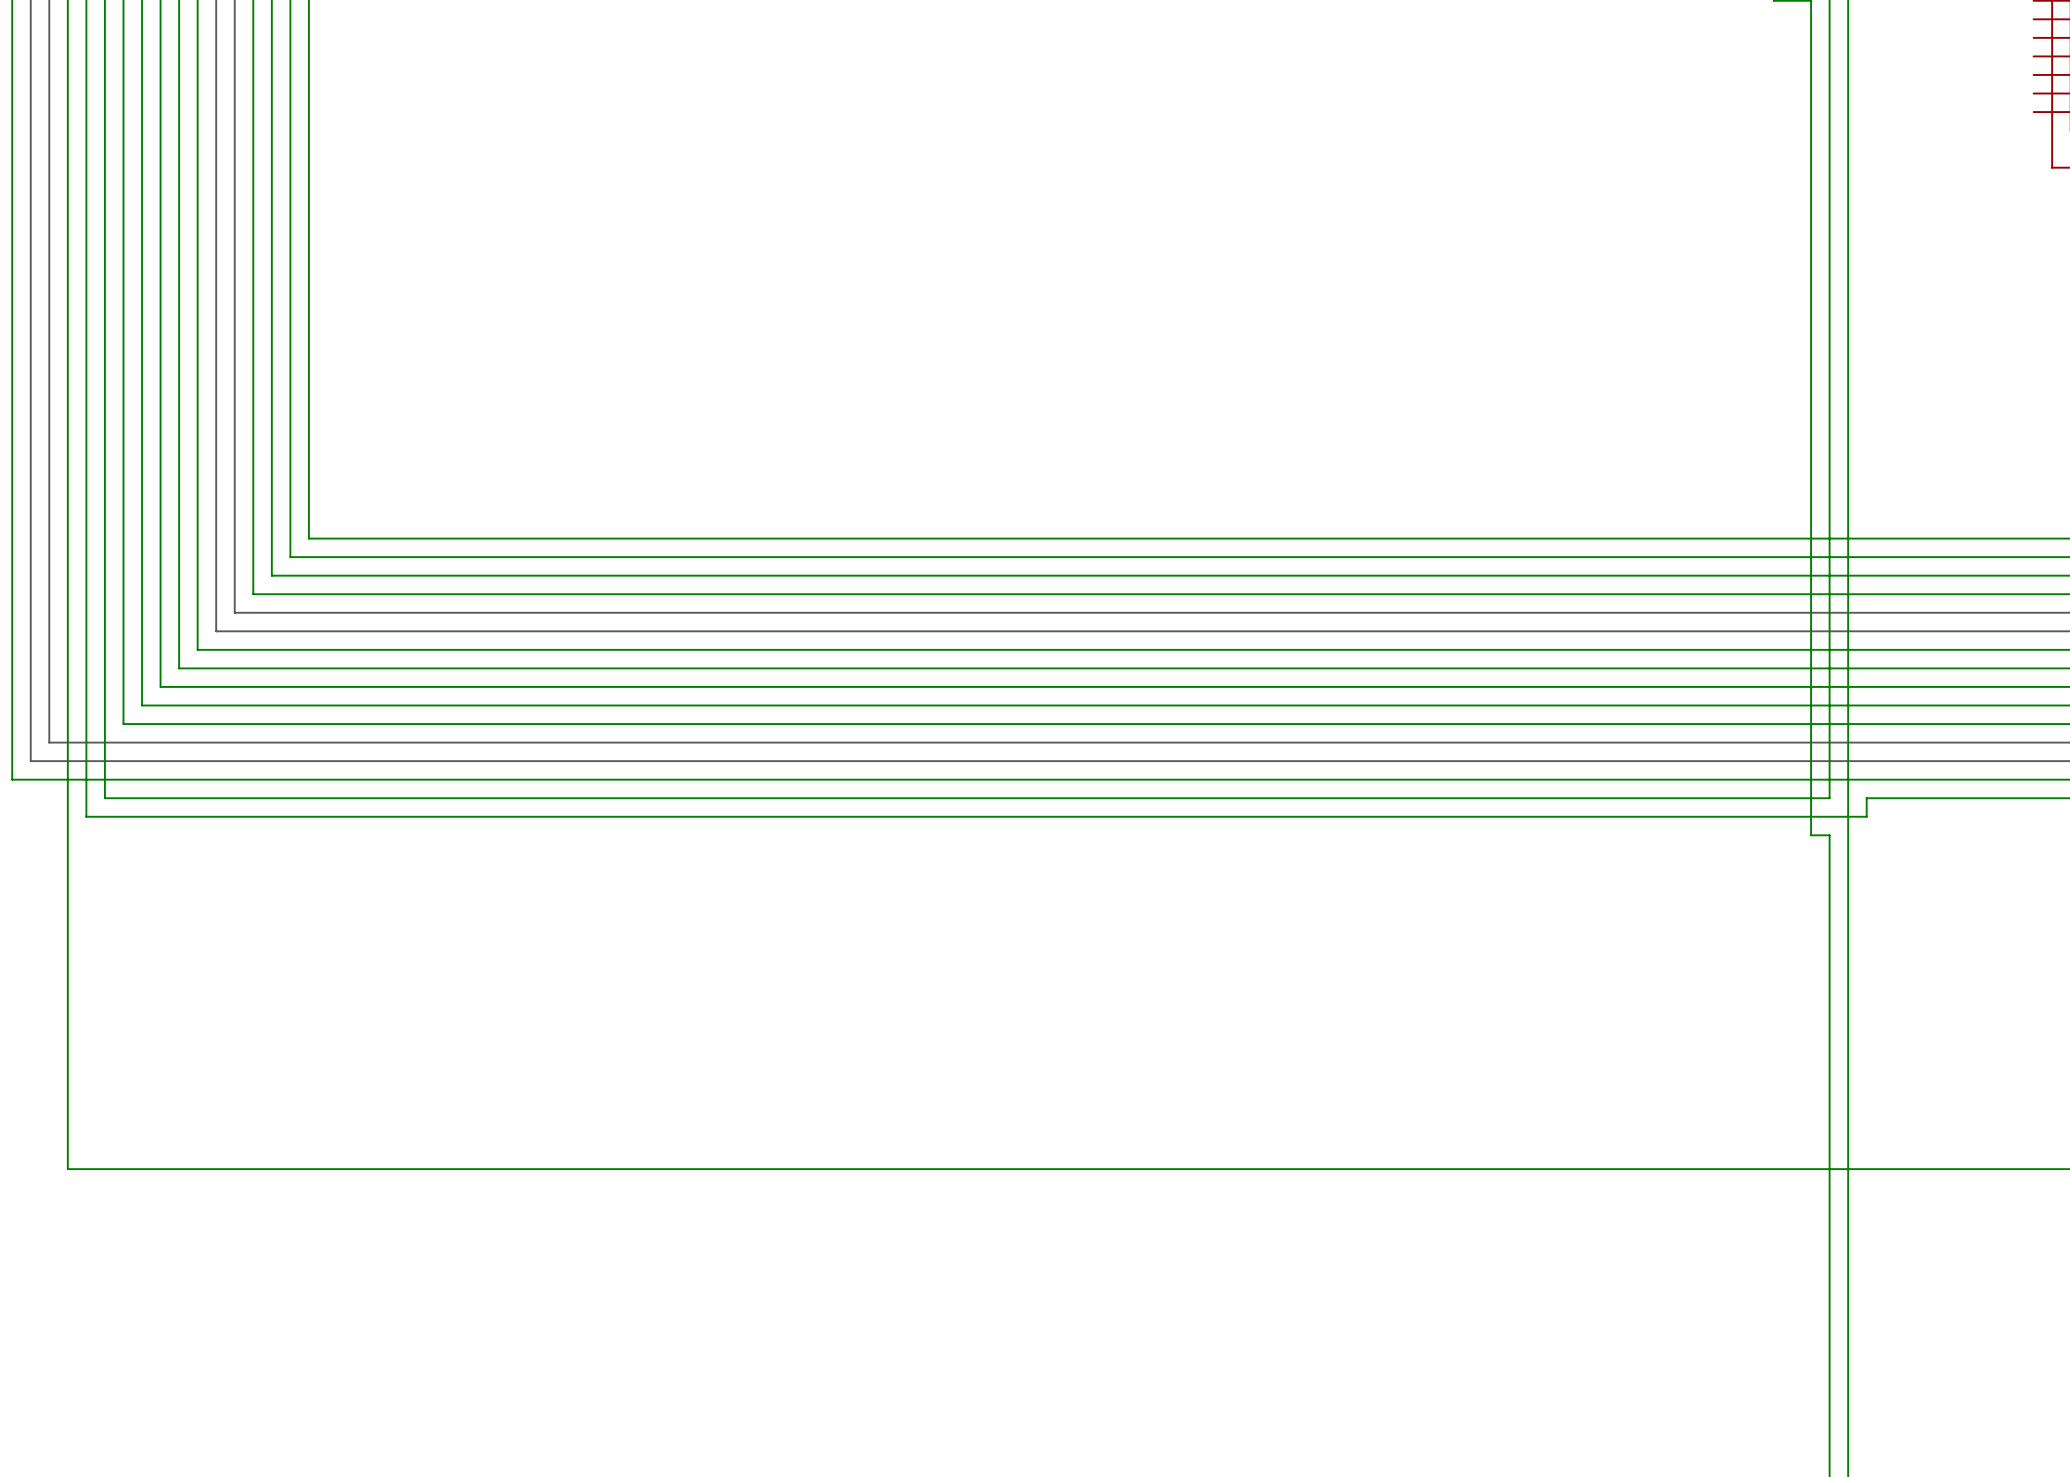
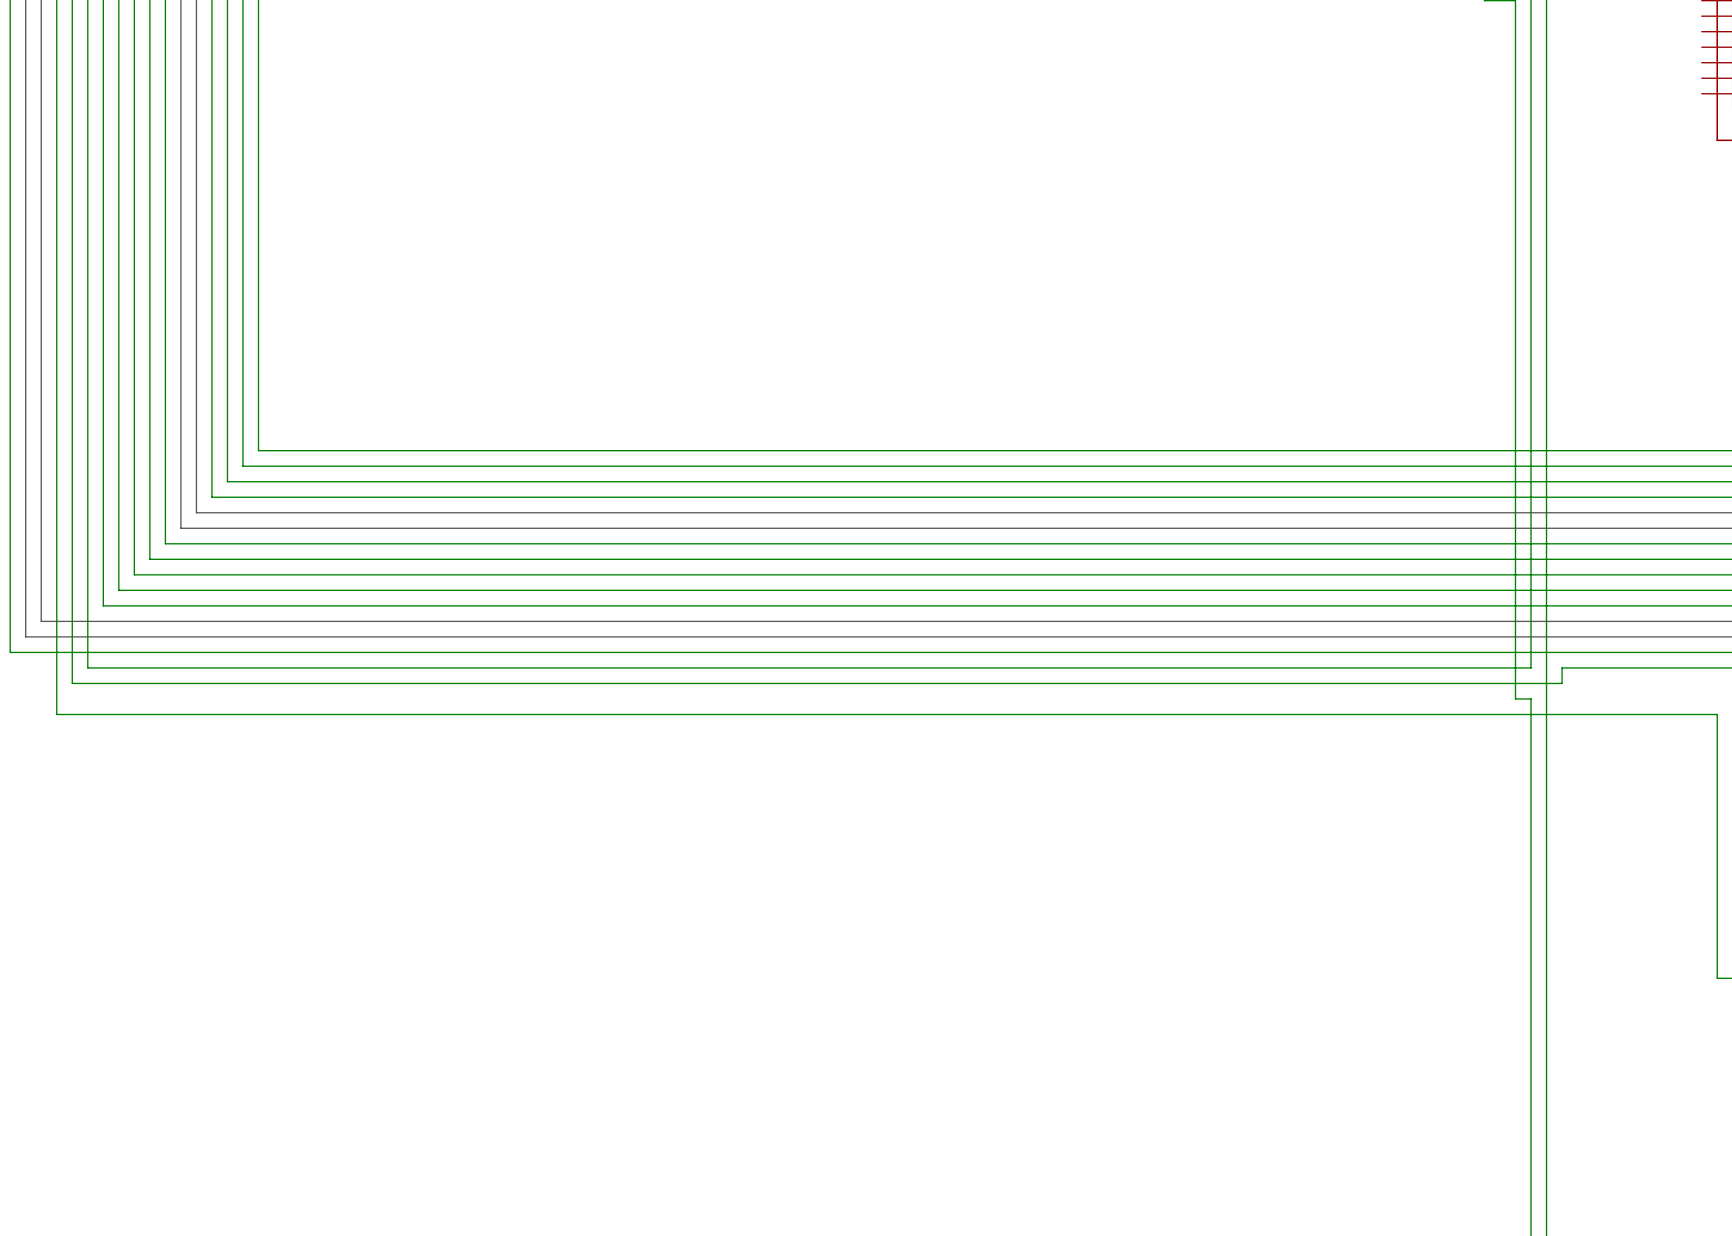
wire: (67, 853) (67, 1169) (2052, 1169) -> (56, 714) (1717, 714) (1717, 978)

